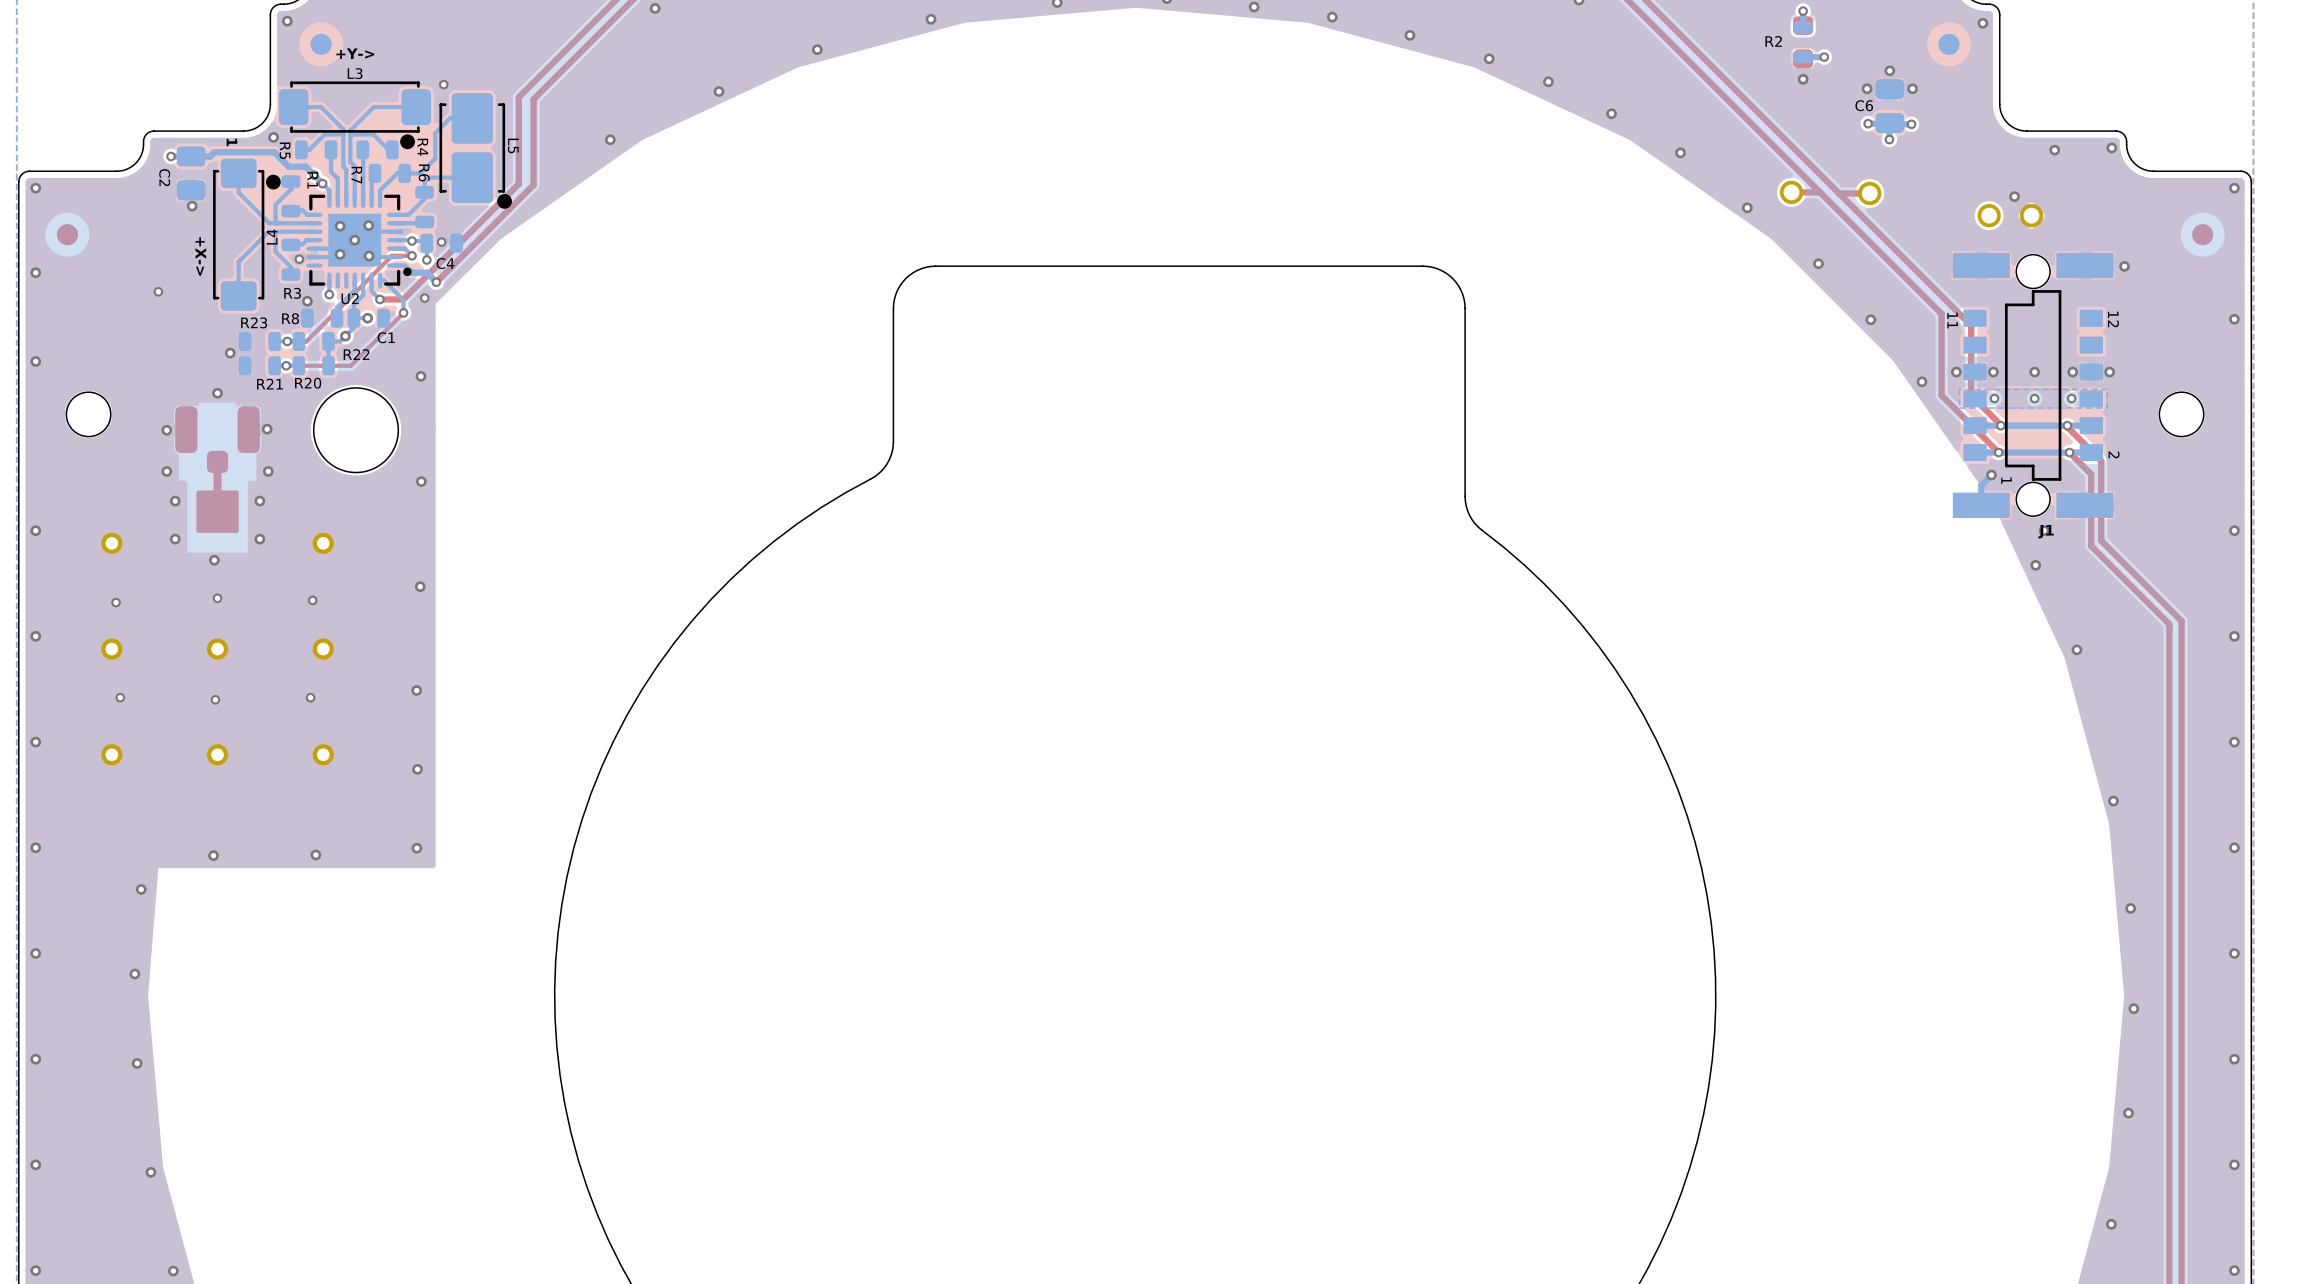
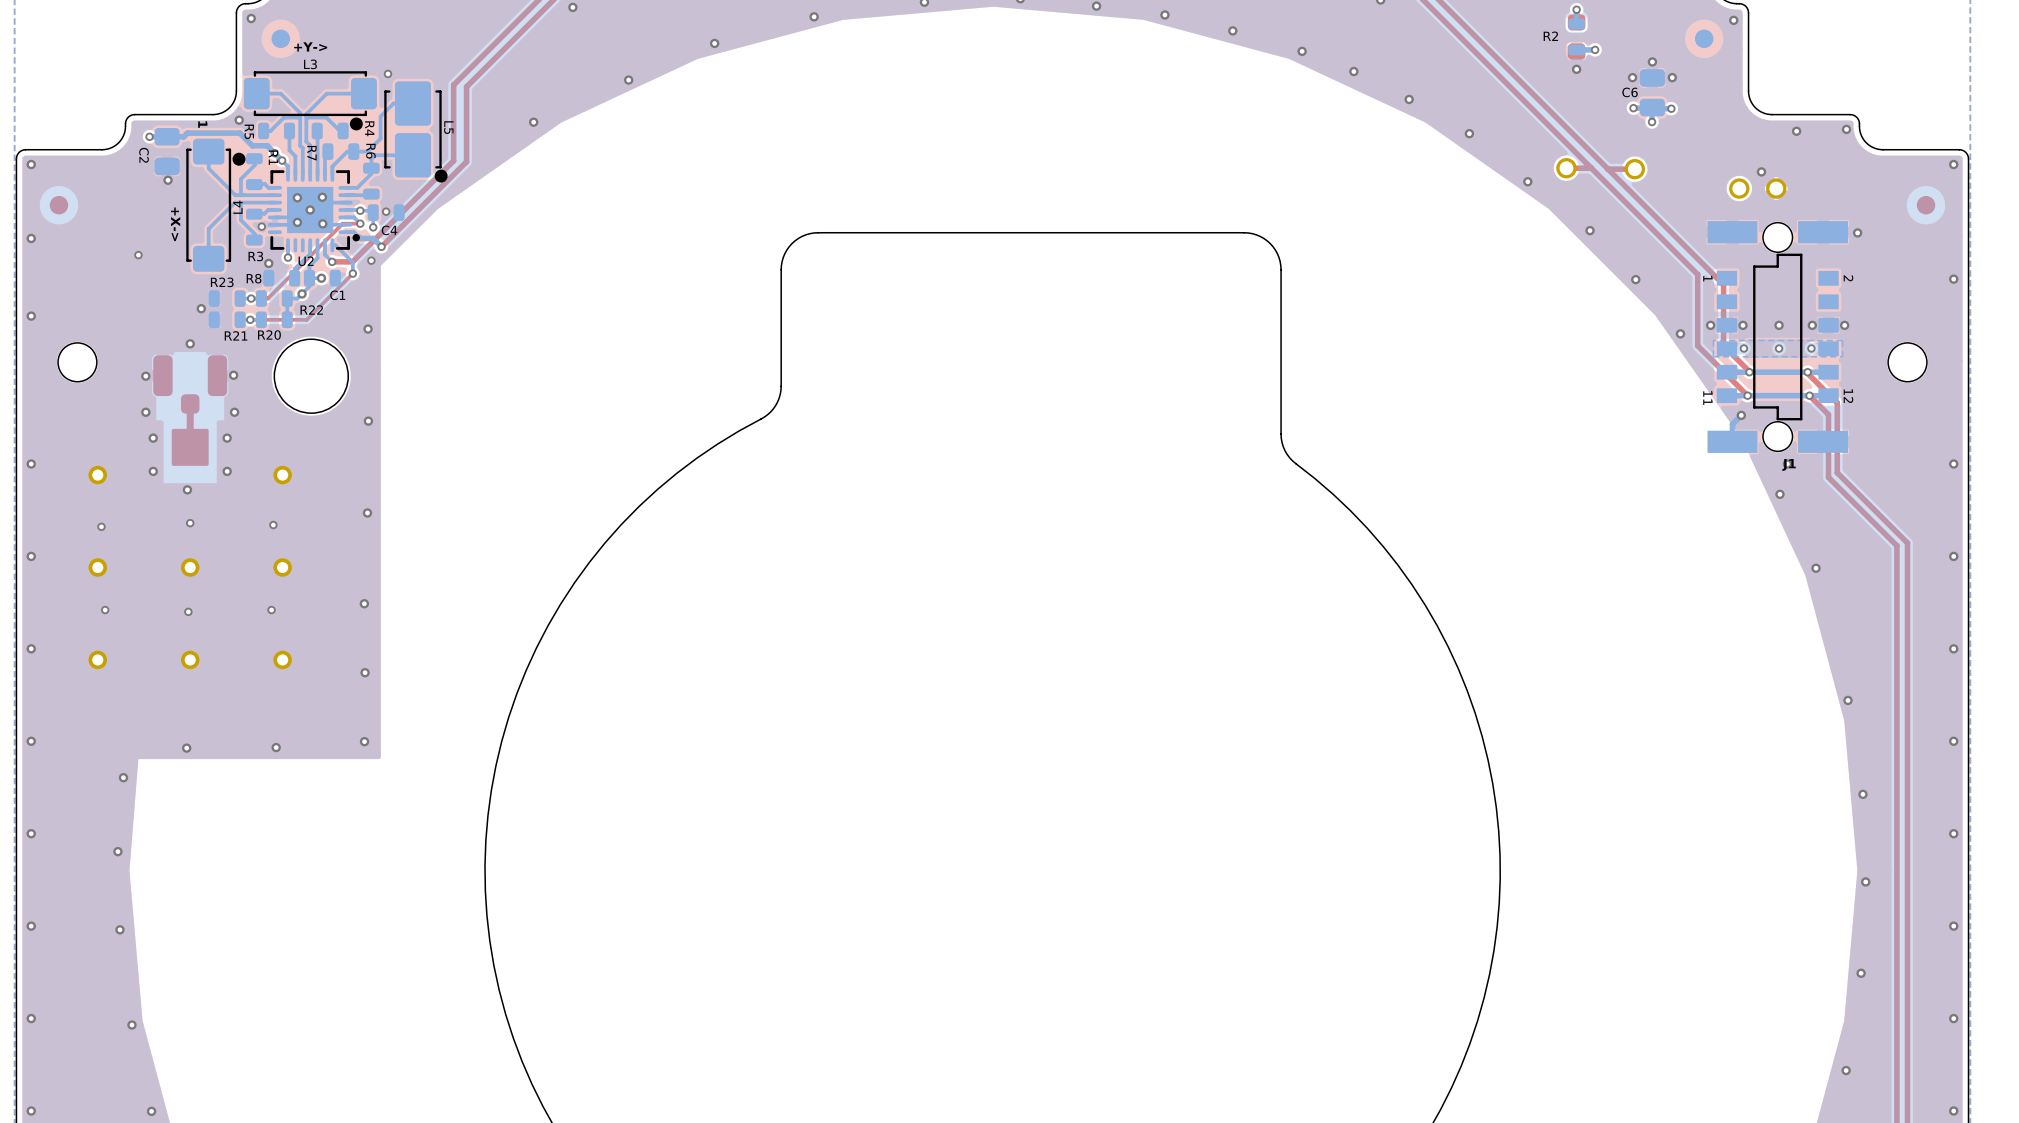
J1 text position: 12 (2113, 319) -> 12 (1848, 396)
J1 text position: 11 (1952, 320) -> 11 (1707, 398)
J1 text position: 2 (2114, 454) -> 2 (1848, 278)
J1 text position: 1 (2006, 480) -> 1 (1707, 278)

